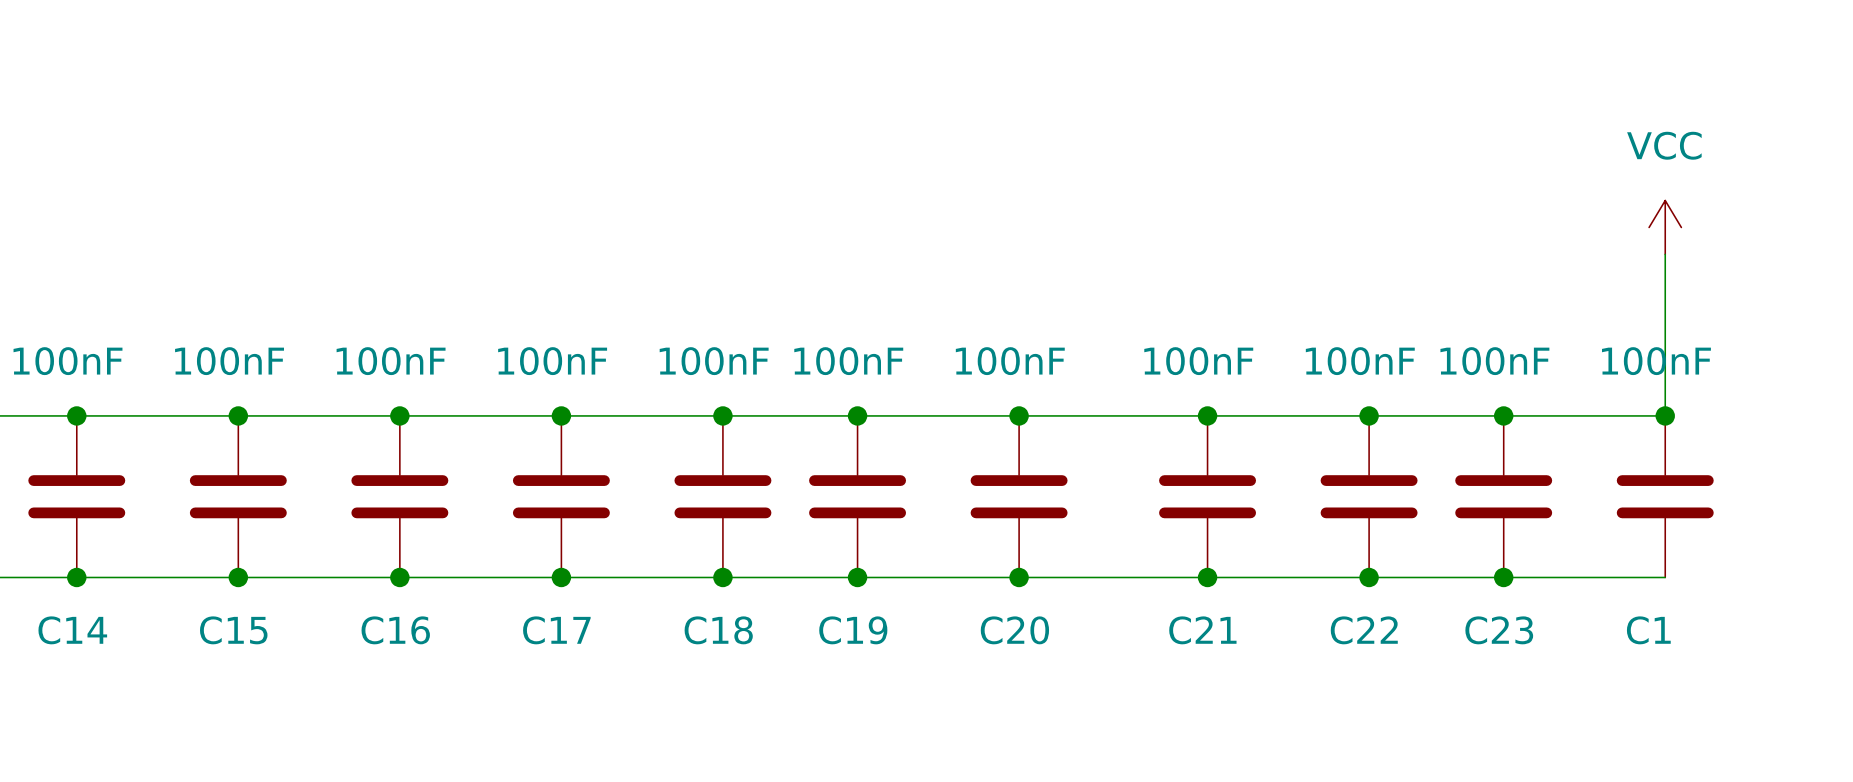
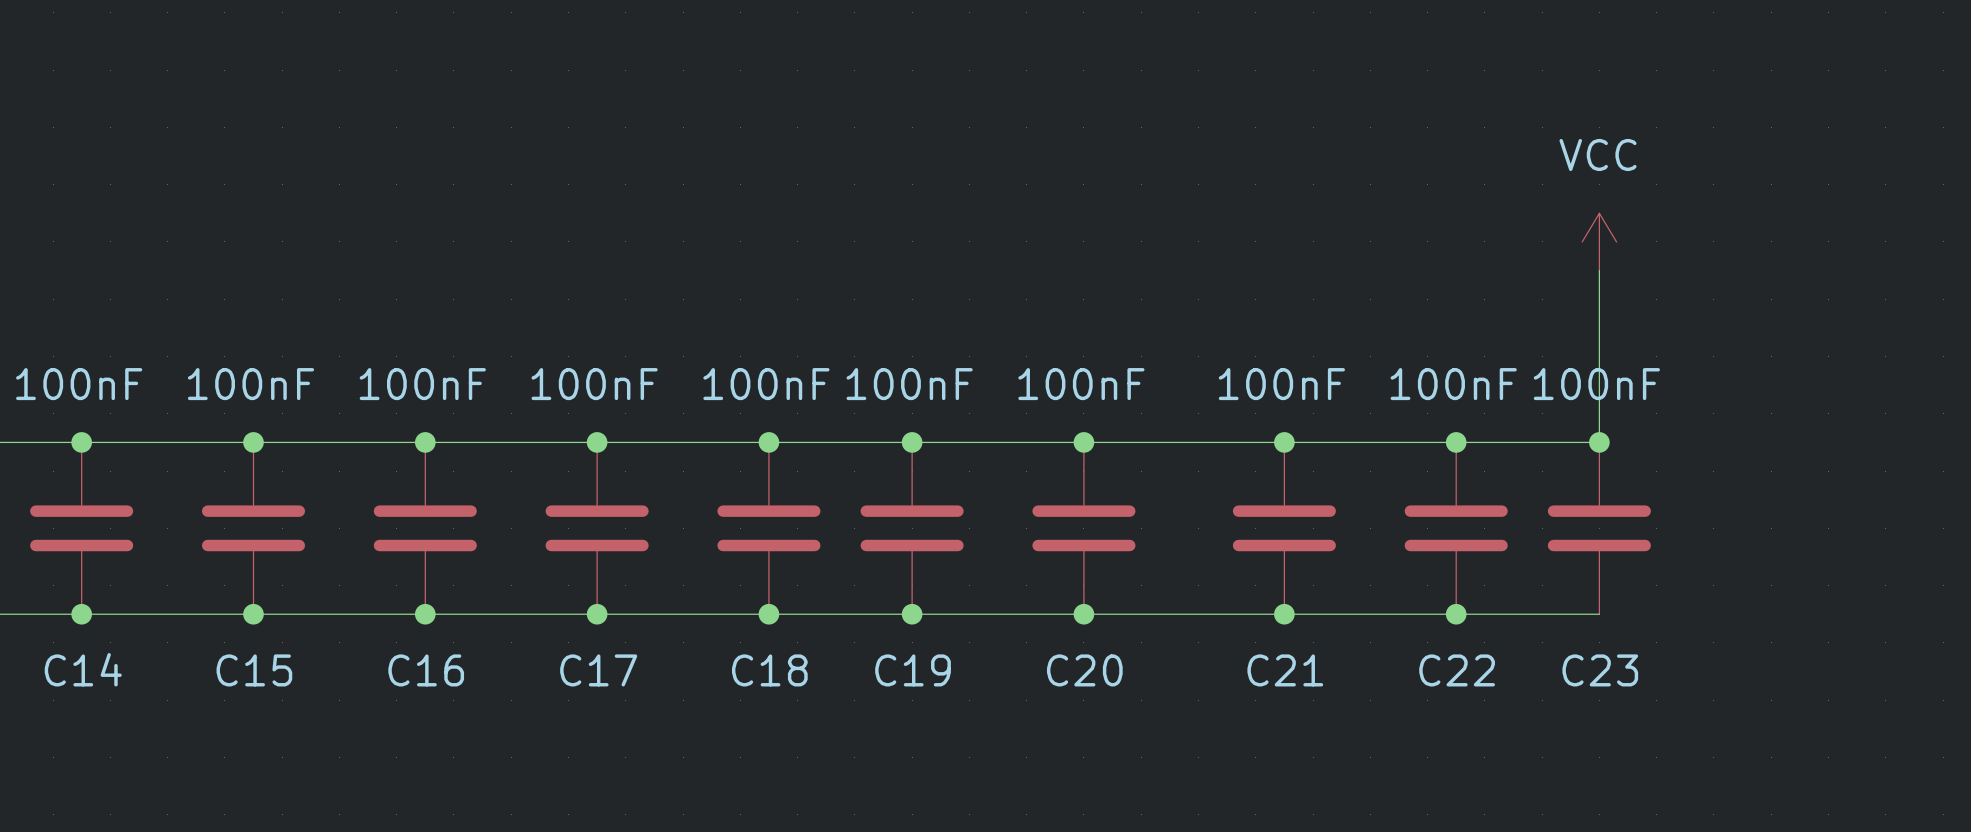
power symbol position: VCC (1665, 227) -> VCC (1599, 241)
wire: (1665, 254) (1665, 415) (1503, 415) -> (1599, 270) (1599, 442)
junction: (1665, 415) -> none
C1: 100nF (1665, 496) -> none
wire: (1503, 577) (1665, 577) -> none
junction: (1503, 577) -> none

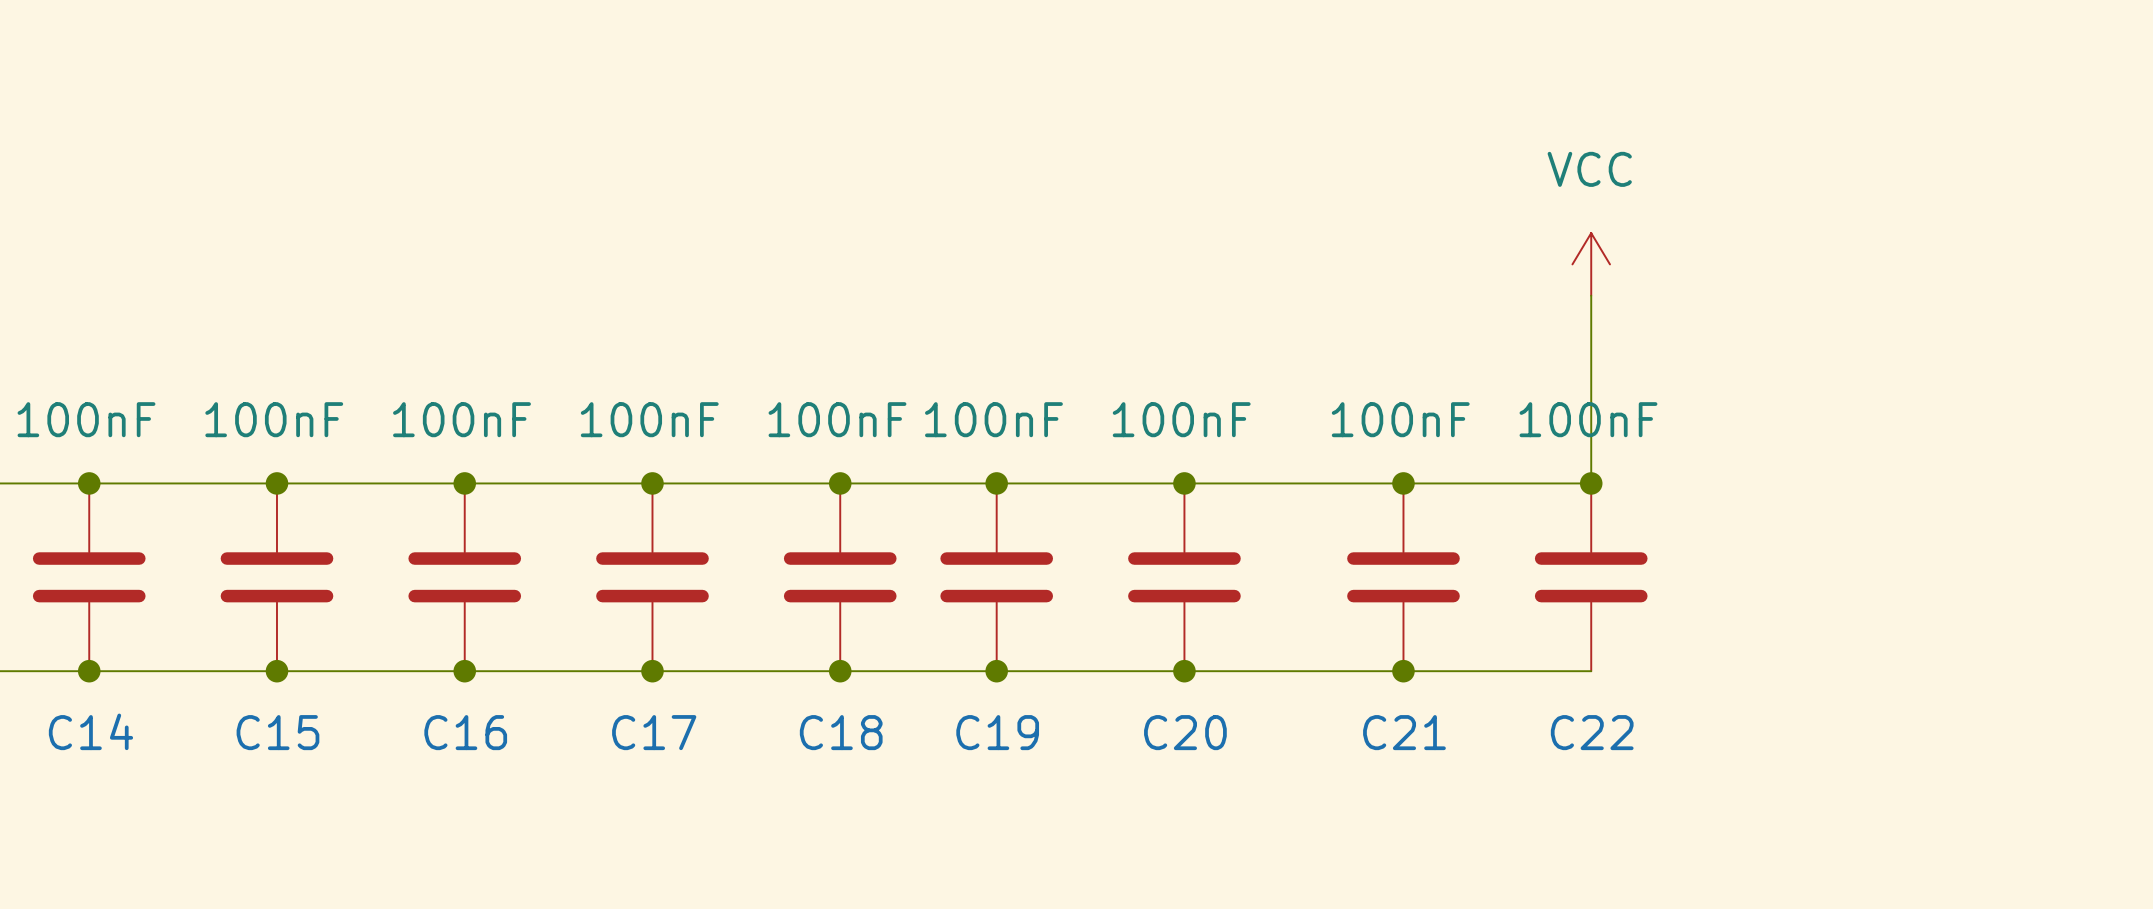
power symbol position: VCC (1599, 241) -> VCC (1591, 264)
wire: (1599, 270) (1599, 442) (1456, 442) -> (1591, 295) (1591, 483)
junction: (1599, 442) -> none
C23: 100nF (1599, 528) -> none
wire: (1456, 614) (1599, 614) -> none
junction: (1456, 614) -> none

